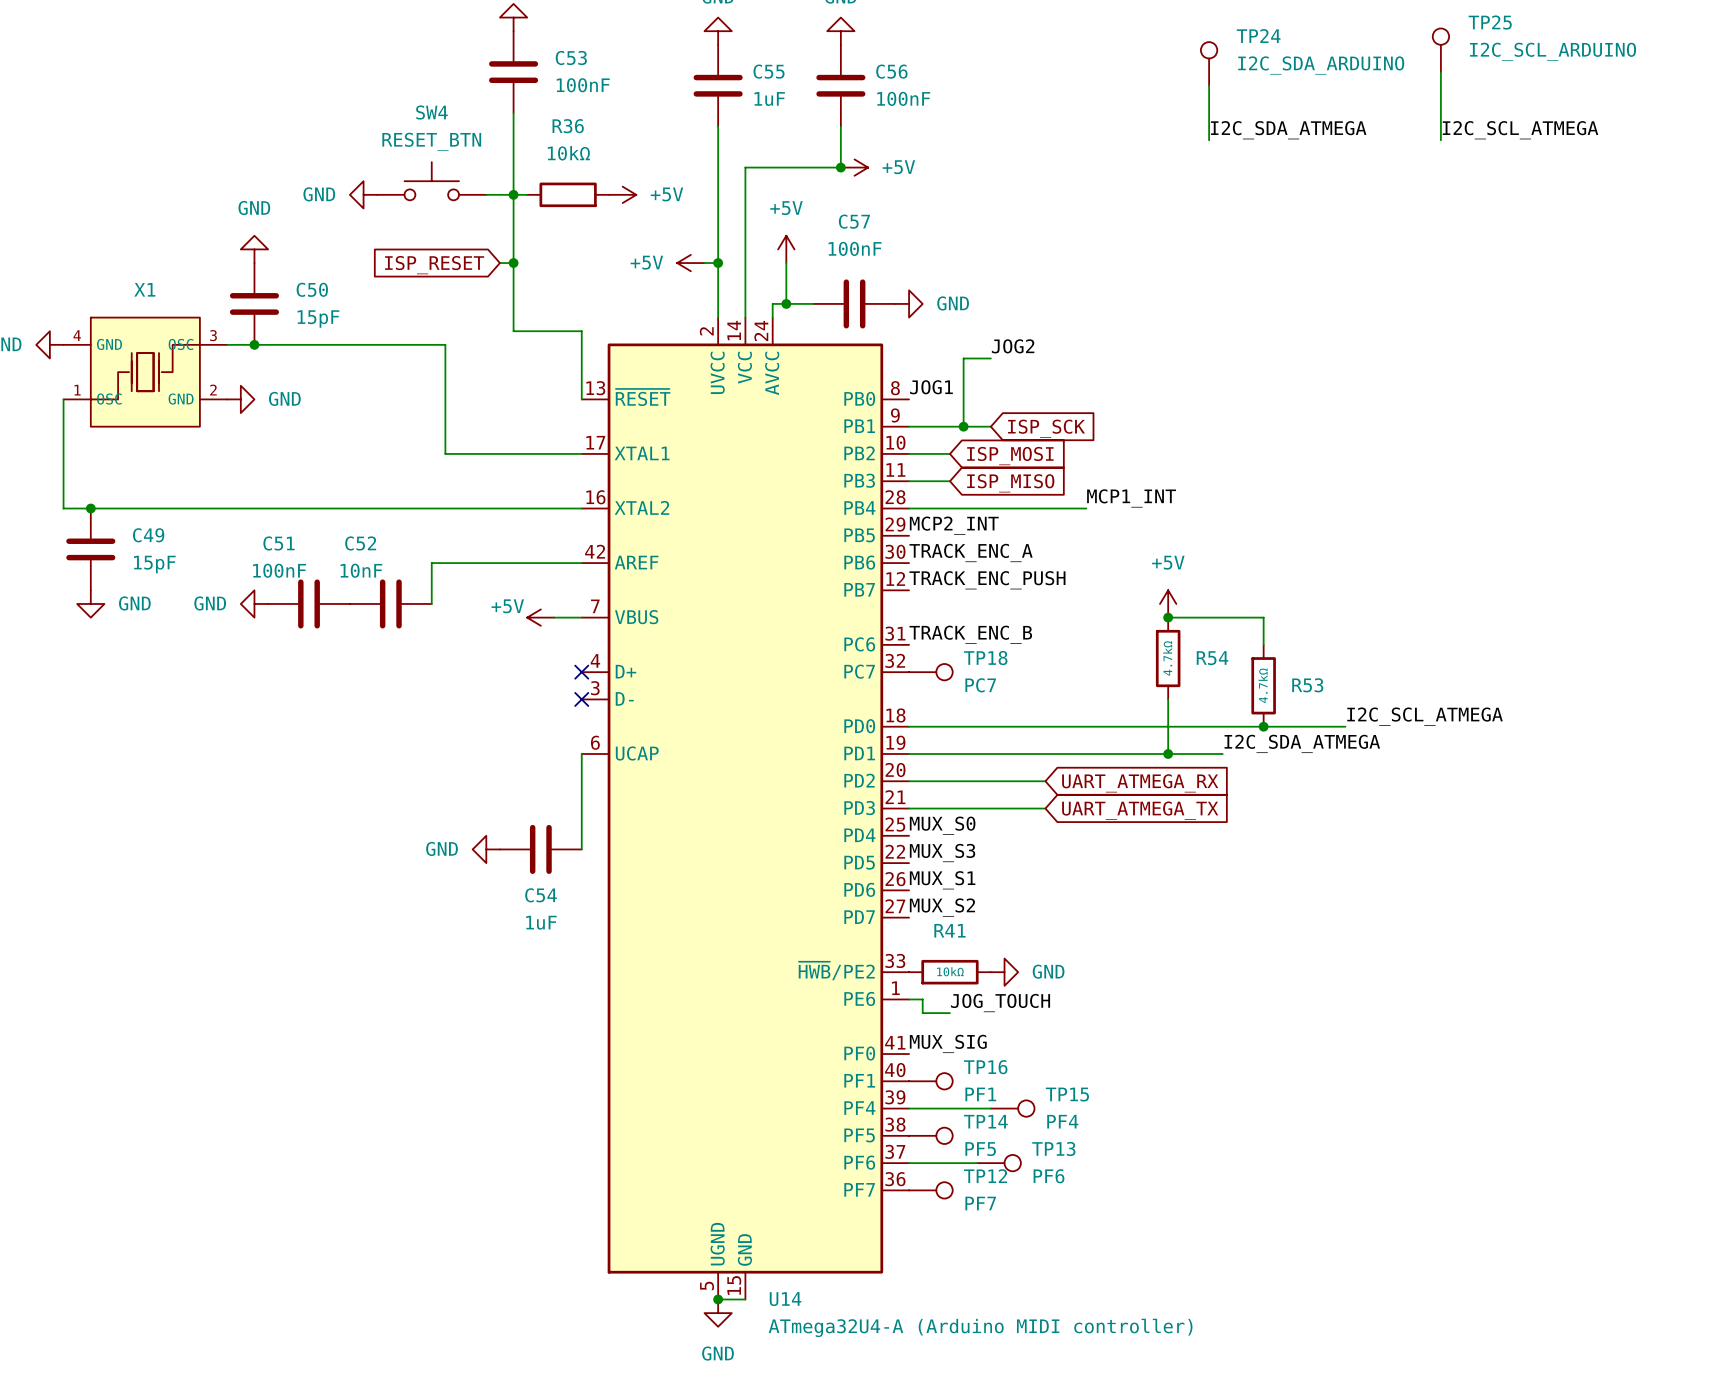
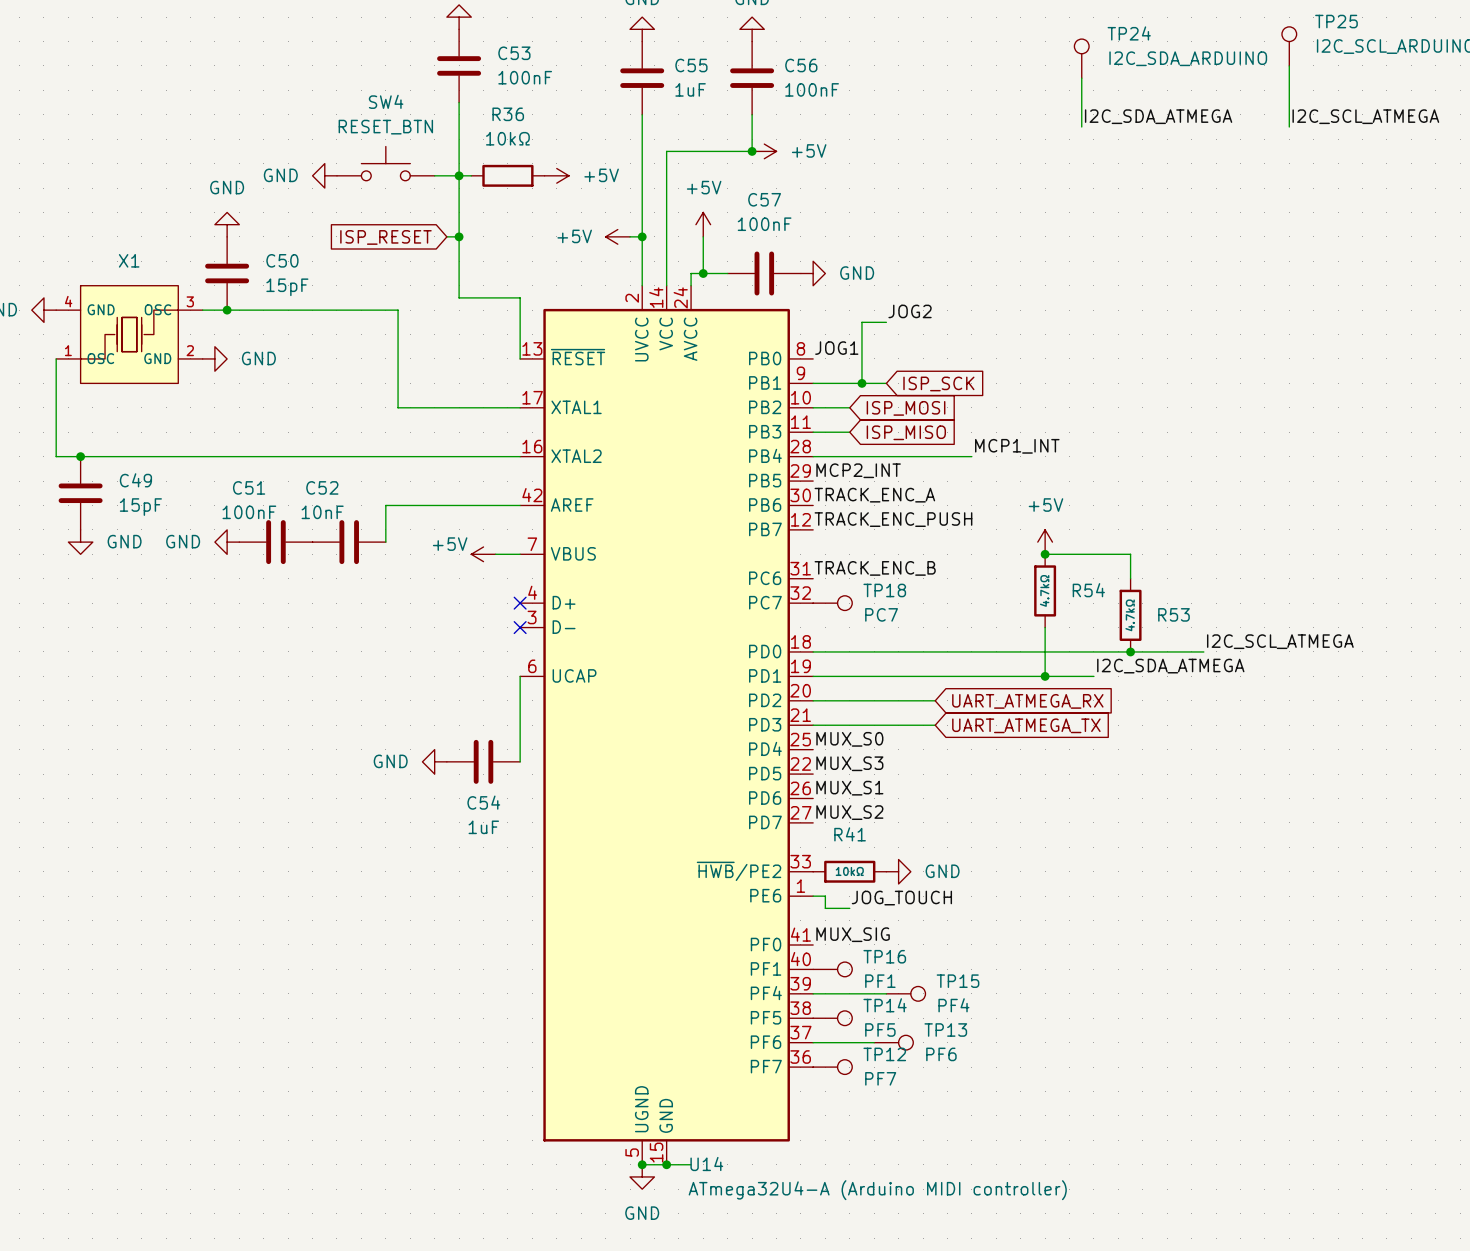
wire: none -> (666, 1164) (691, 1164)
junction: none -> (666, 1164)

